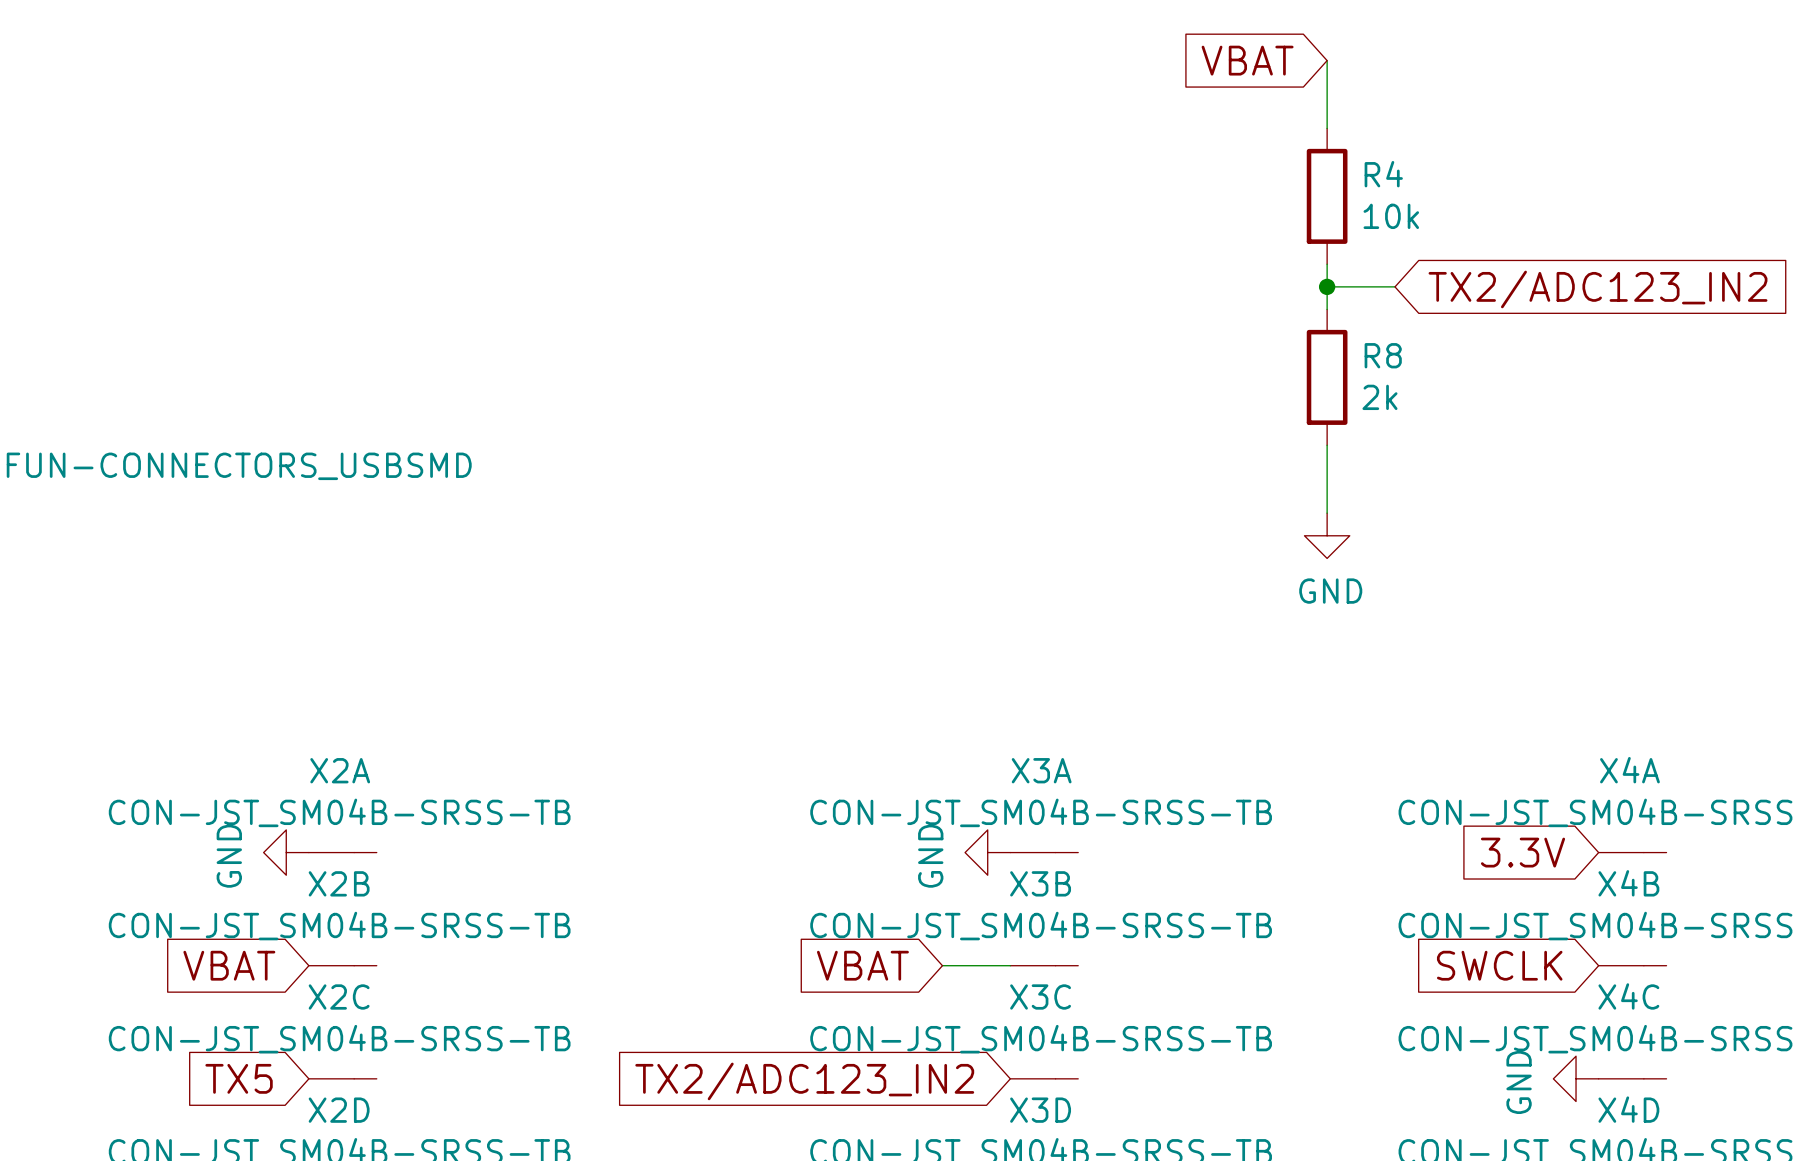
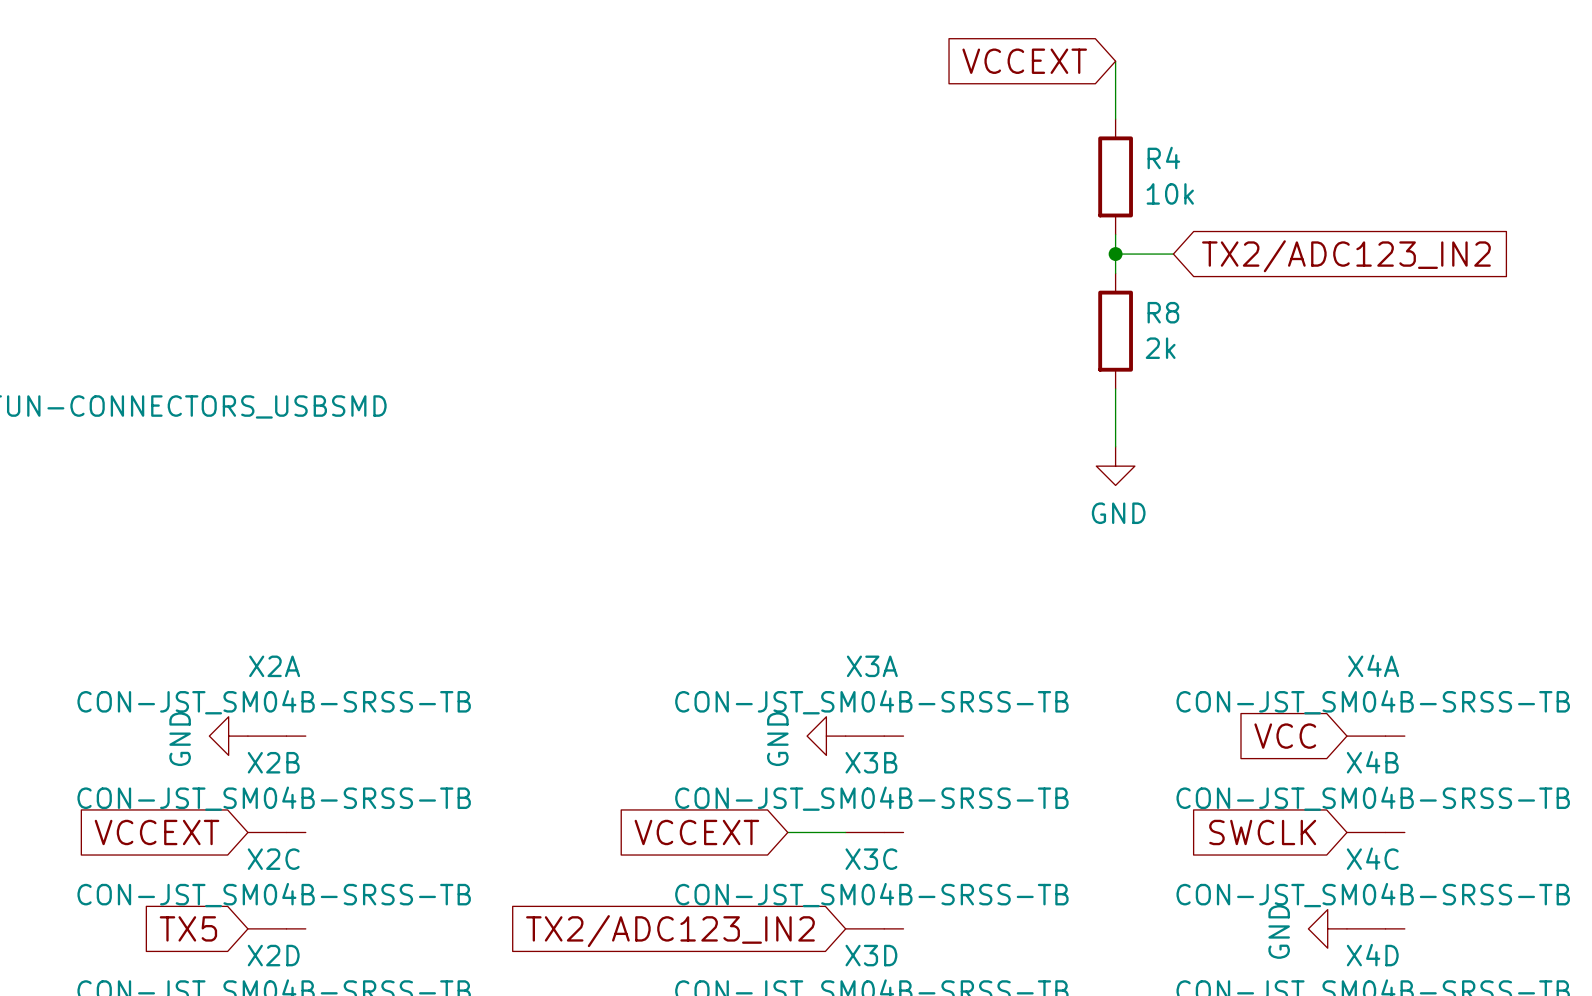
global label: VBAT (1247, 60) -> VCCEXT (1024, 61)
global label: 3.3V (1523, 852) -> VCC (1285, 736)
global label: VBAT (229, 965) -> VCCEXT (157, 832)
global label: VBAT (862, 965) -> VCCEXT (696, 832)

